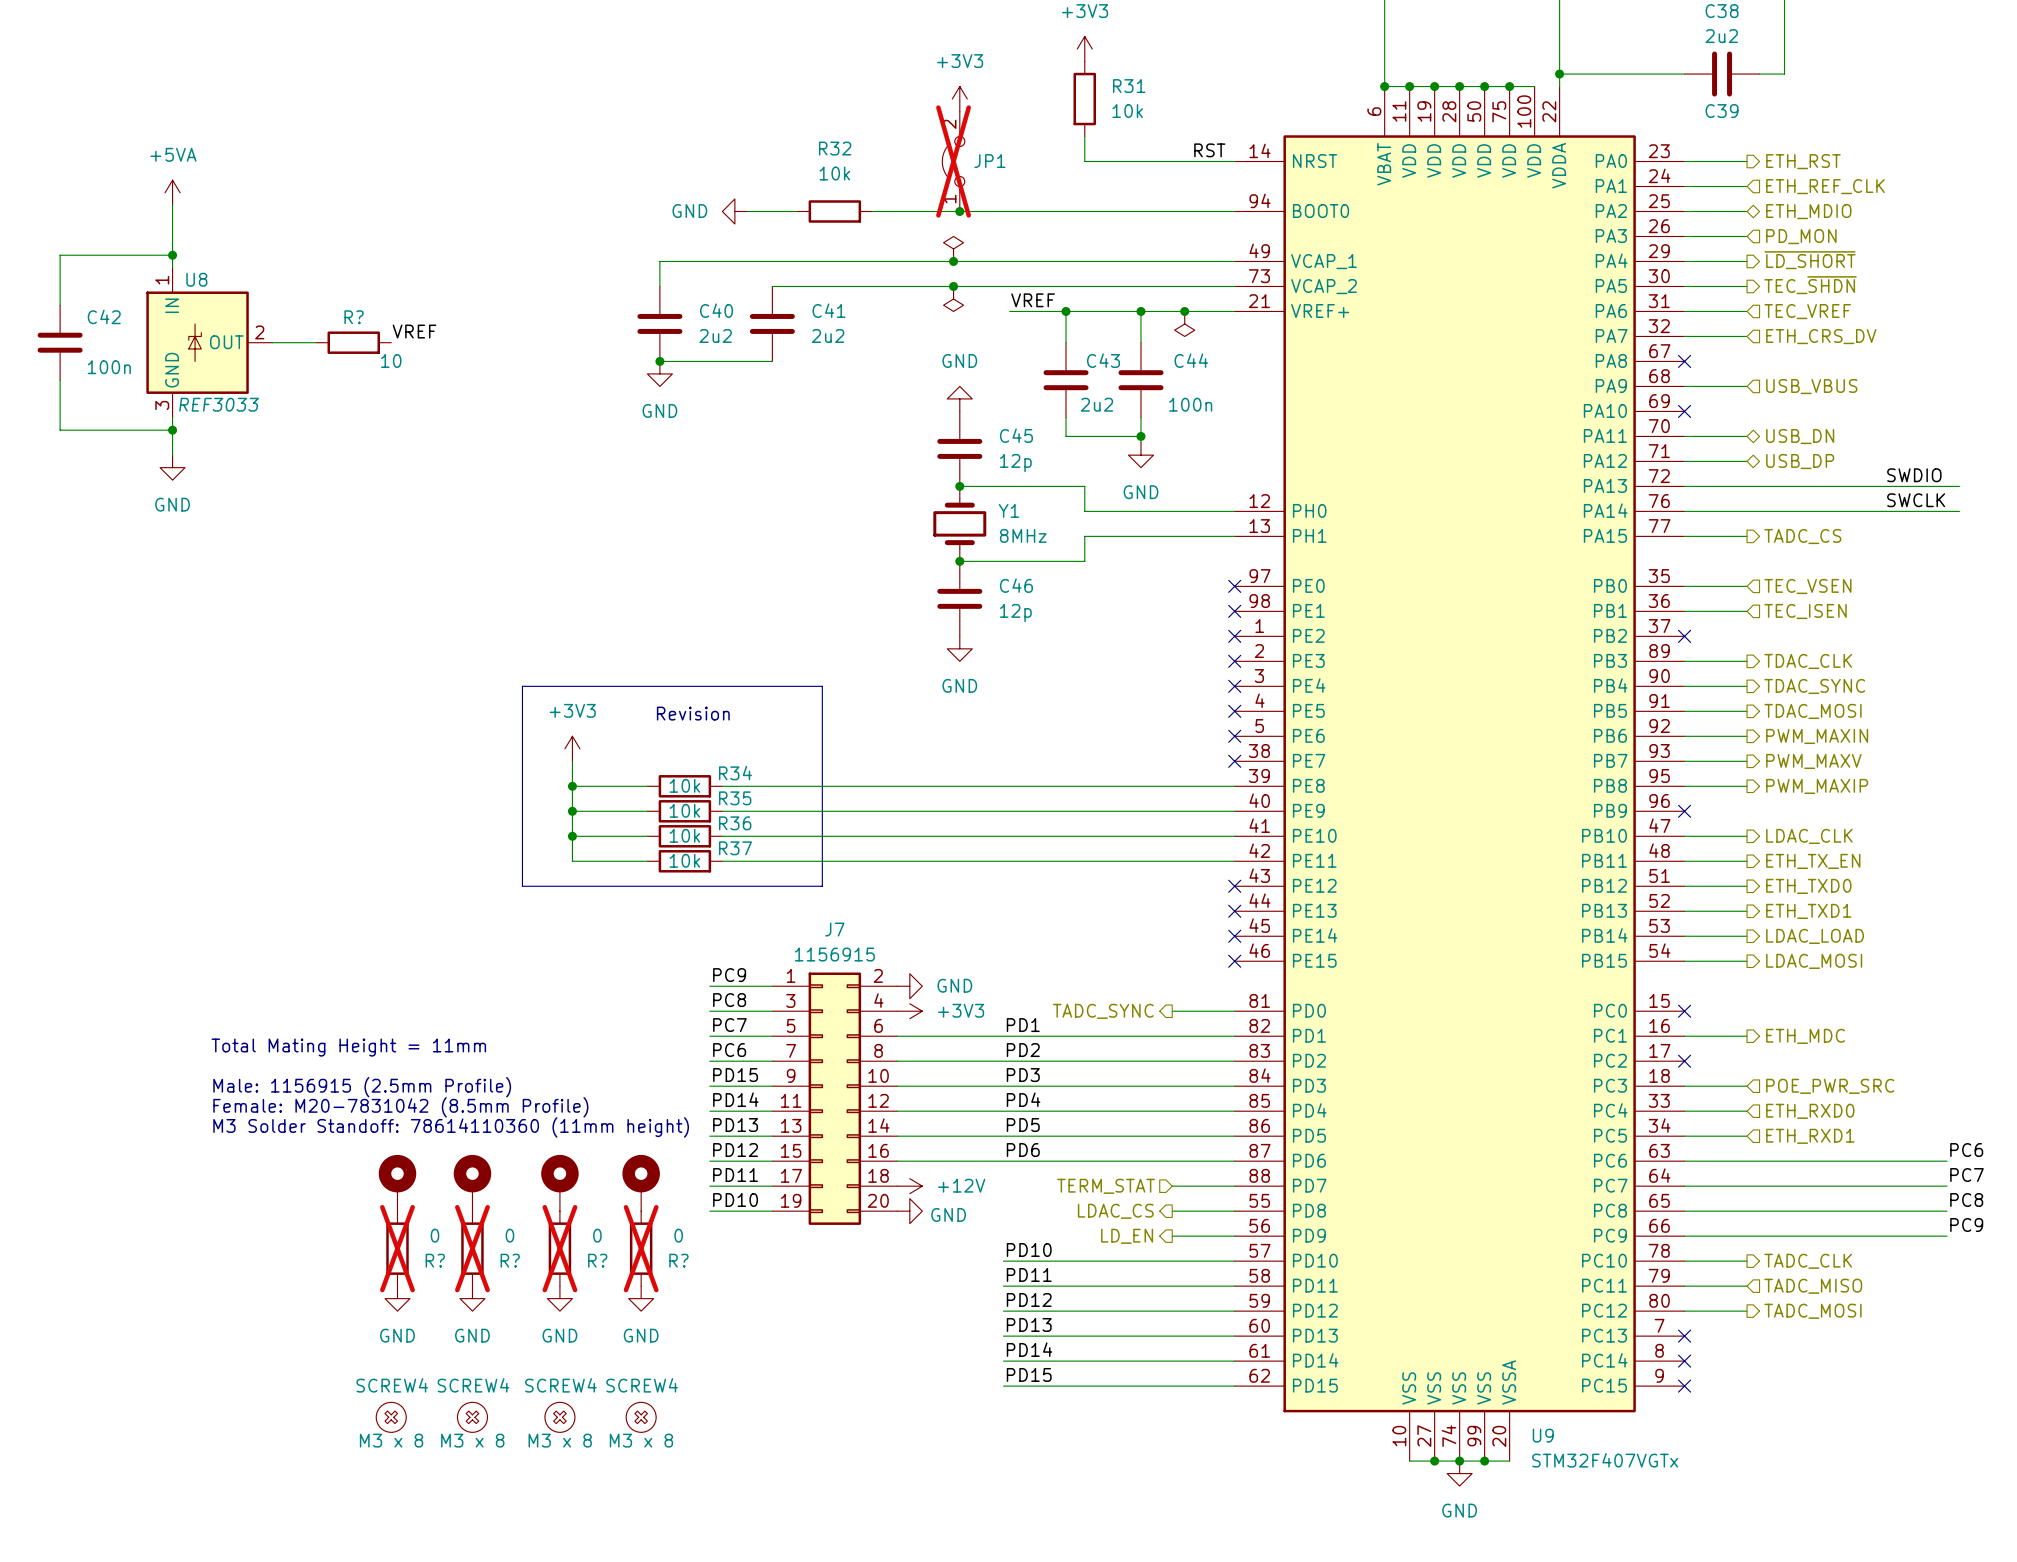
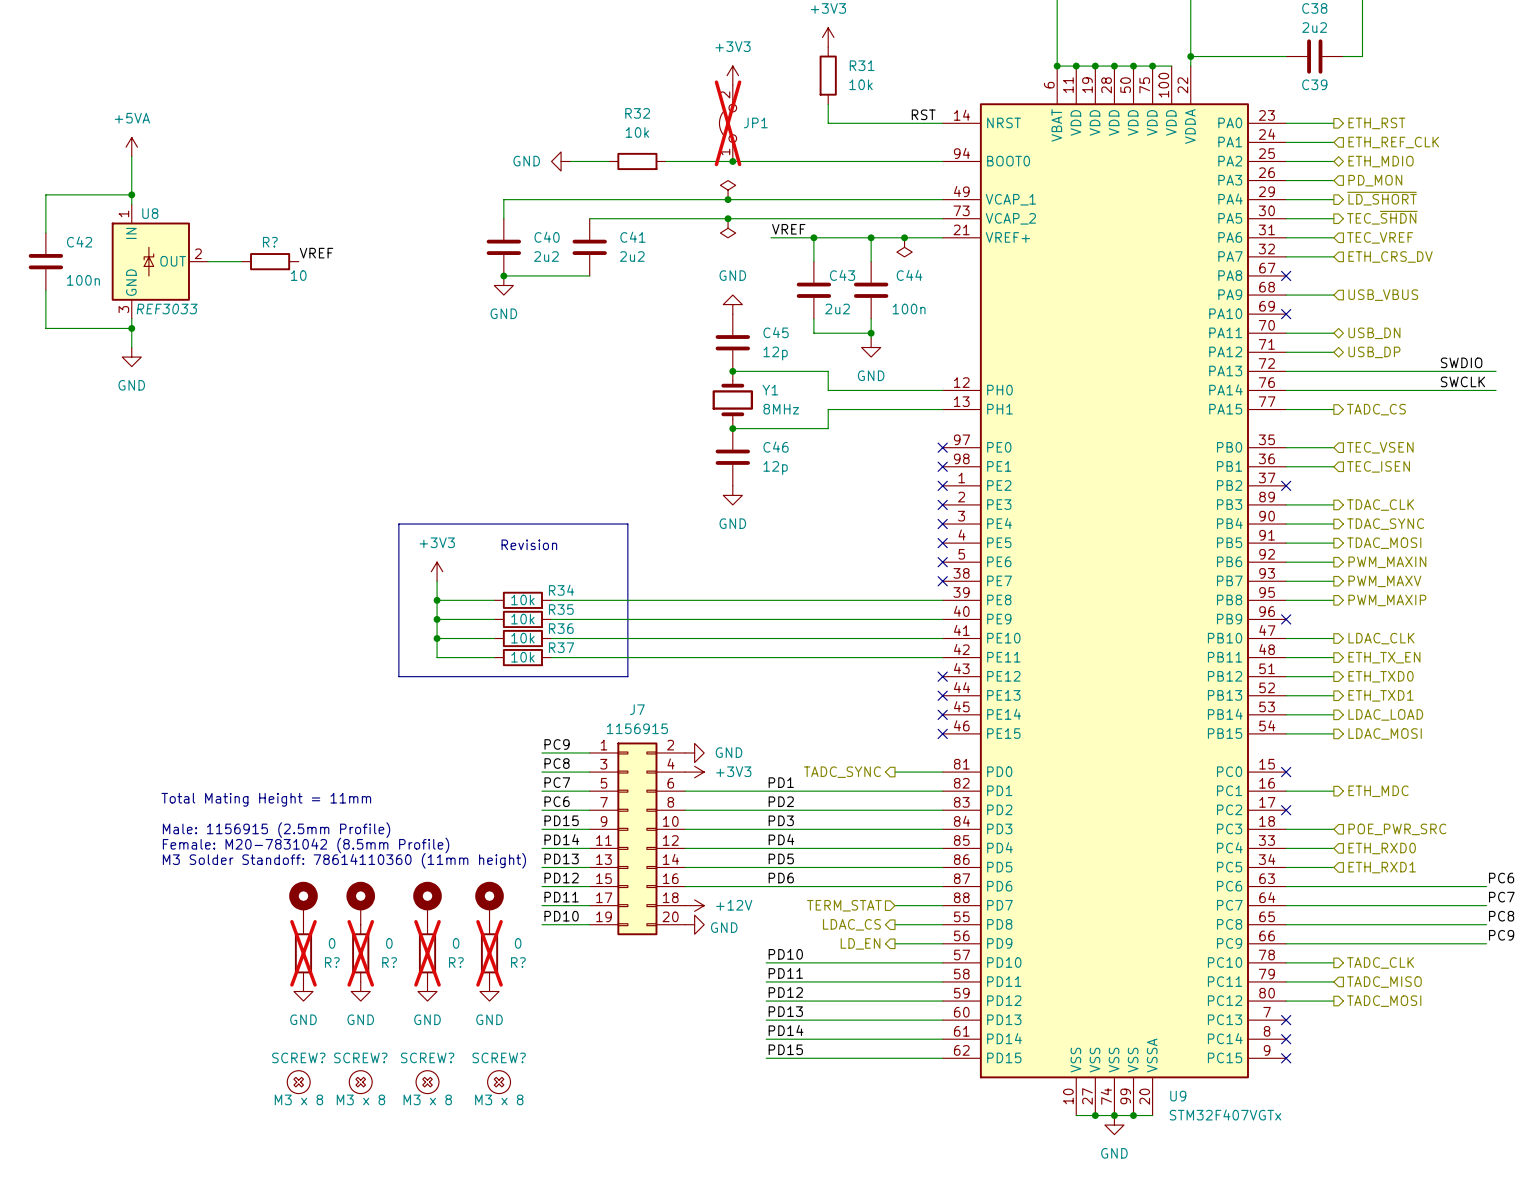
SCREW4 name: SCREW4 (392, 1385) -> SCREW? (298, 1057)
SCREW4 name: SCREW4 (473, 1385) -> SCREW? (360, 1057)
SCREW4 name: SCREW4 (560, 1385) -> SCREW? (427, 1057)
SCREW4: M3 x 8 (641, 1417) -> none
SCREW?: none -> M3 x 8 (499, 1082)

